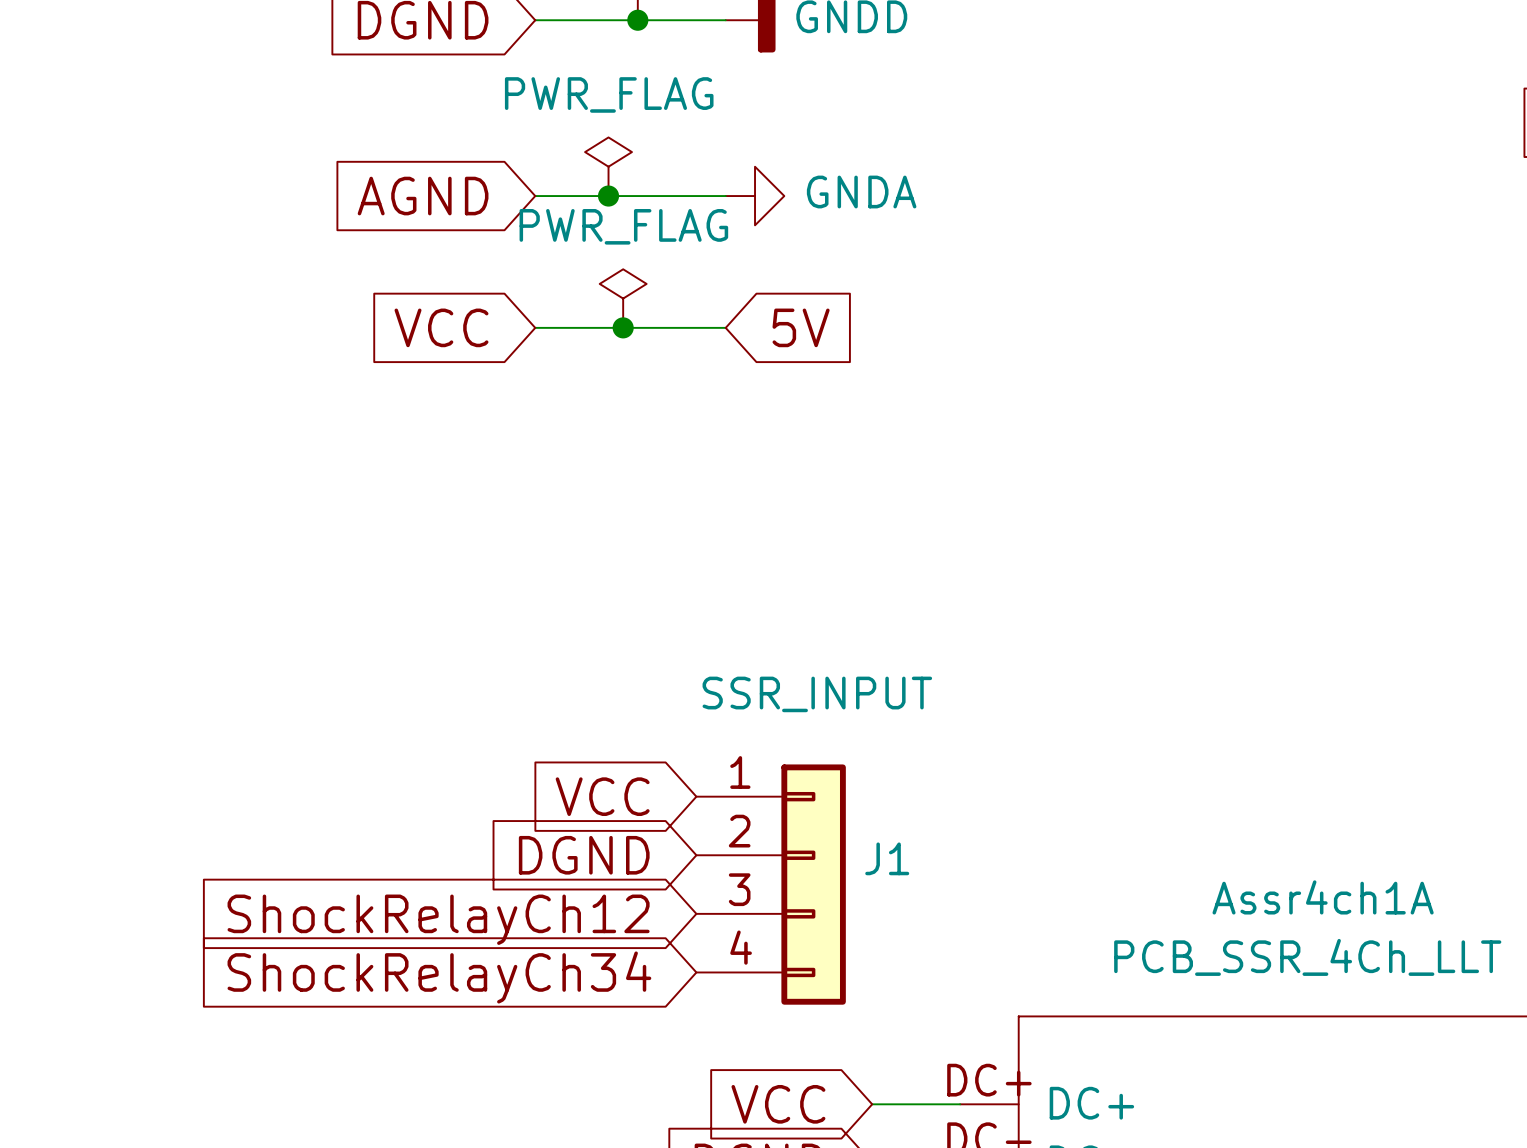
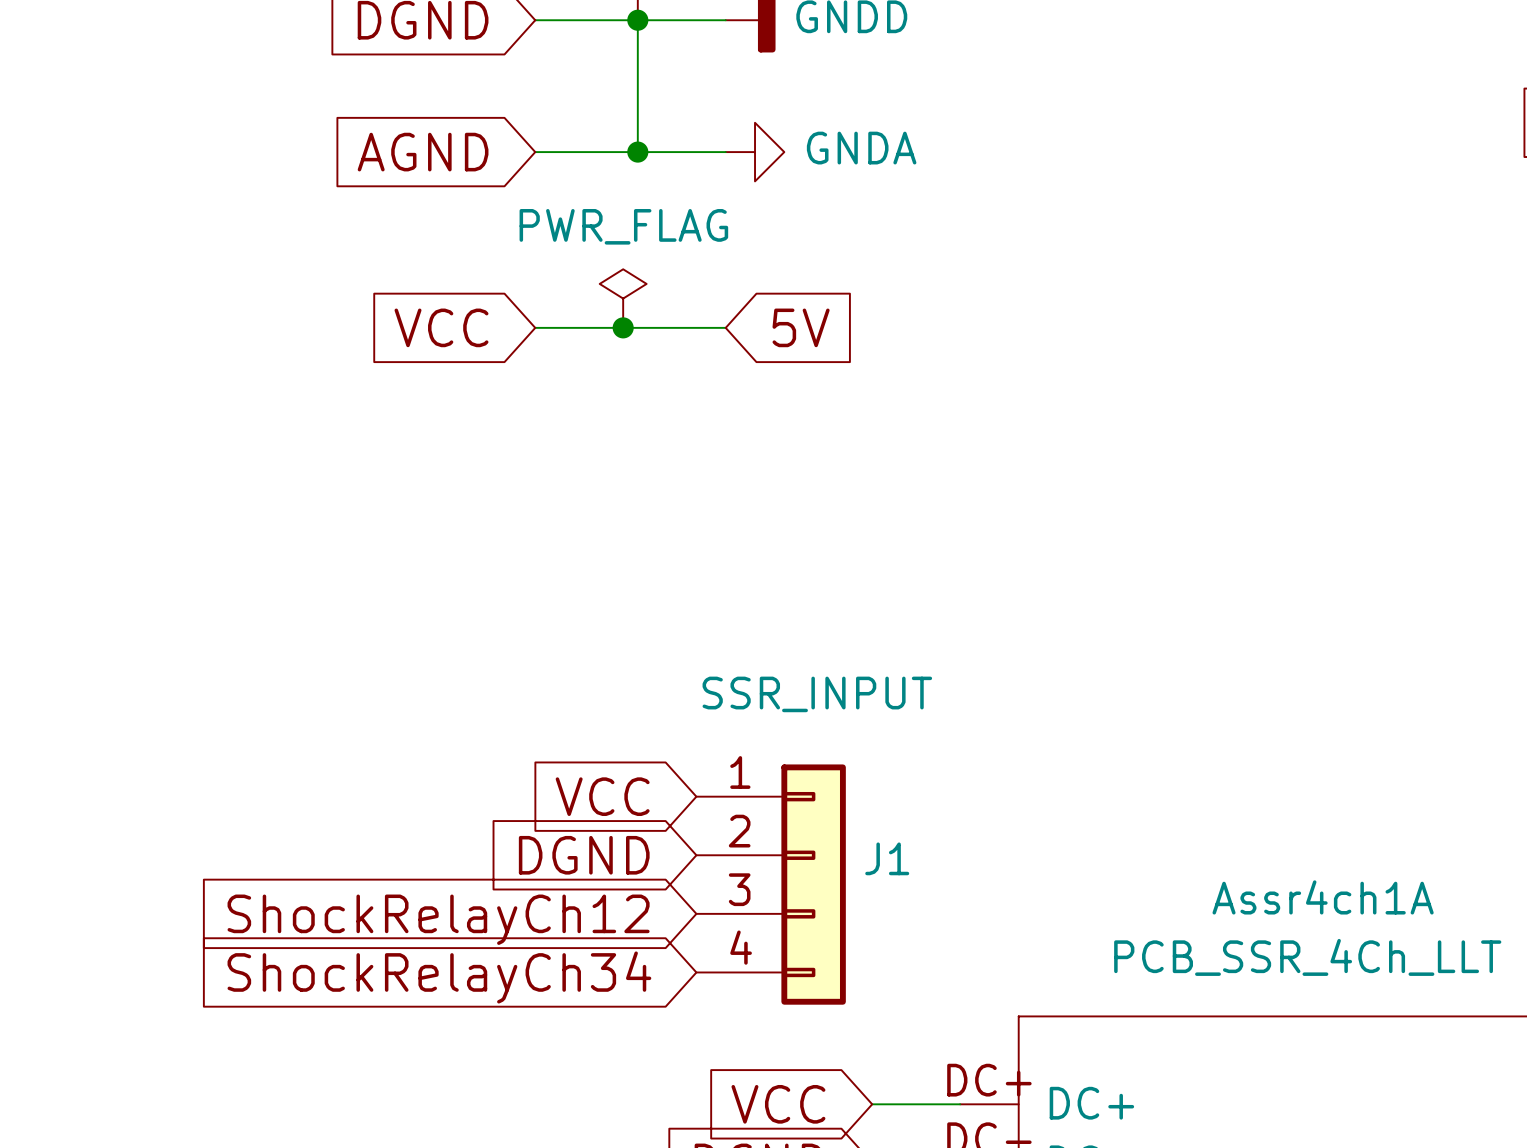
wire: none -> (637, 20) (637, 152)
power symbol: PWR_FLAG (608, 166) -> none
global label position: AGND (423, 196) -> AGND (423, 152)
wire: (535, 196) (725, 196) -> (535, 152) (725, 152)
junction position: (608, 196) -> (637, 152)
power symbol position: GNDA (755, 196) -> GNDA (755, 152)

